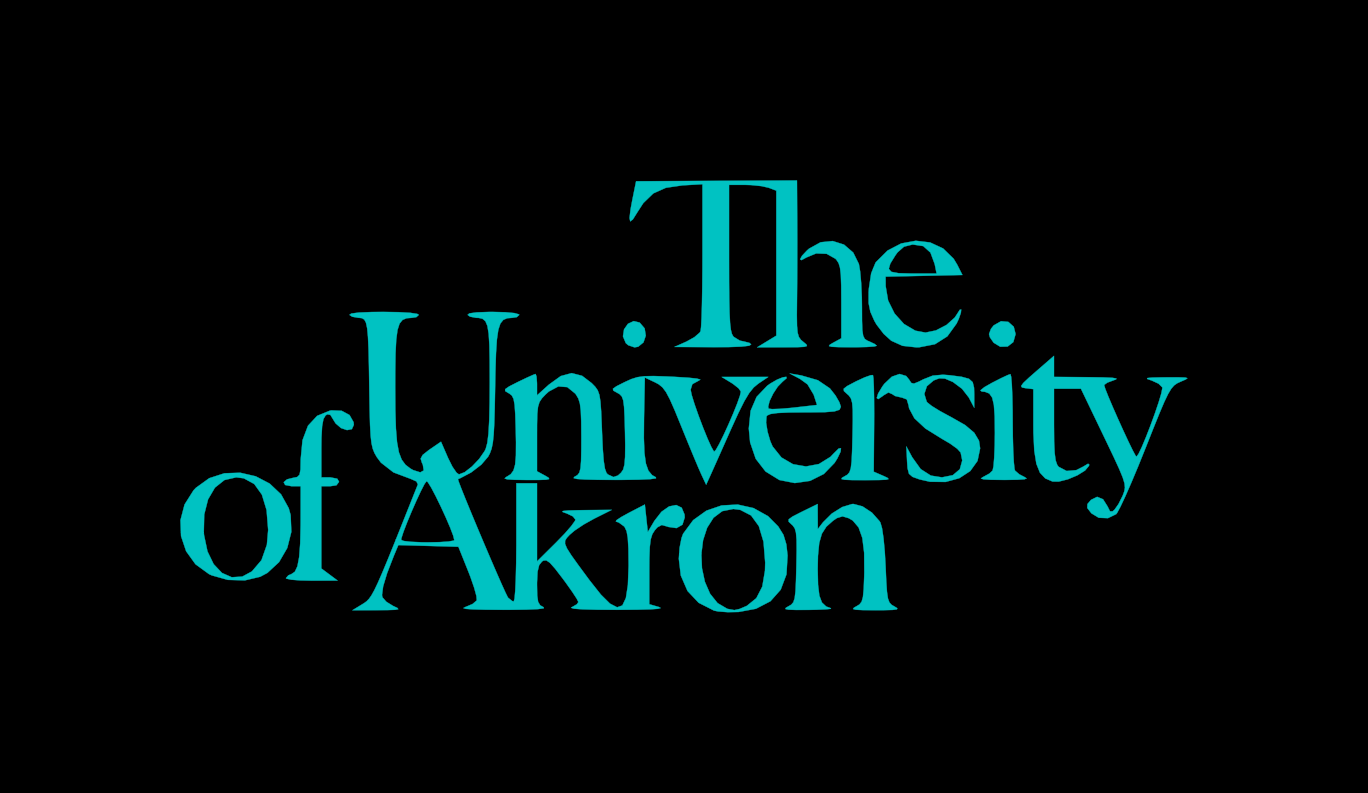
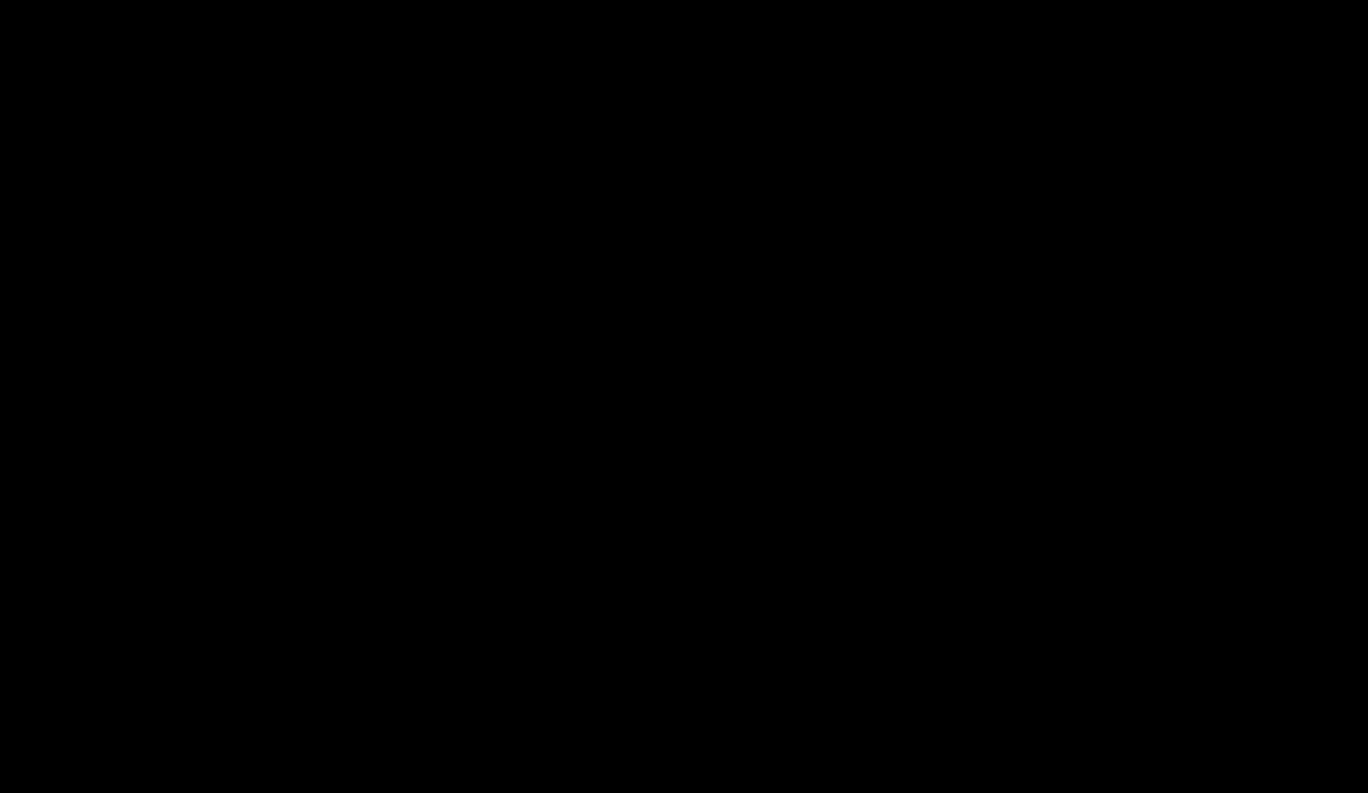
drawing: [180, 180, 1188, 613] -> none

